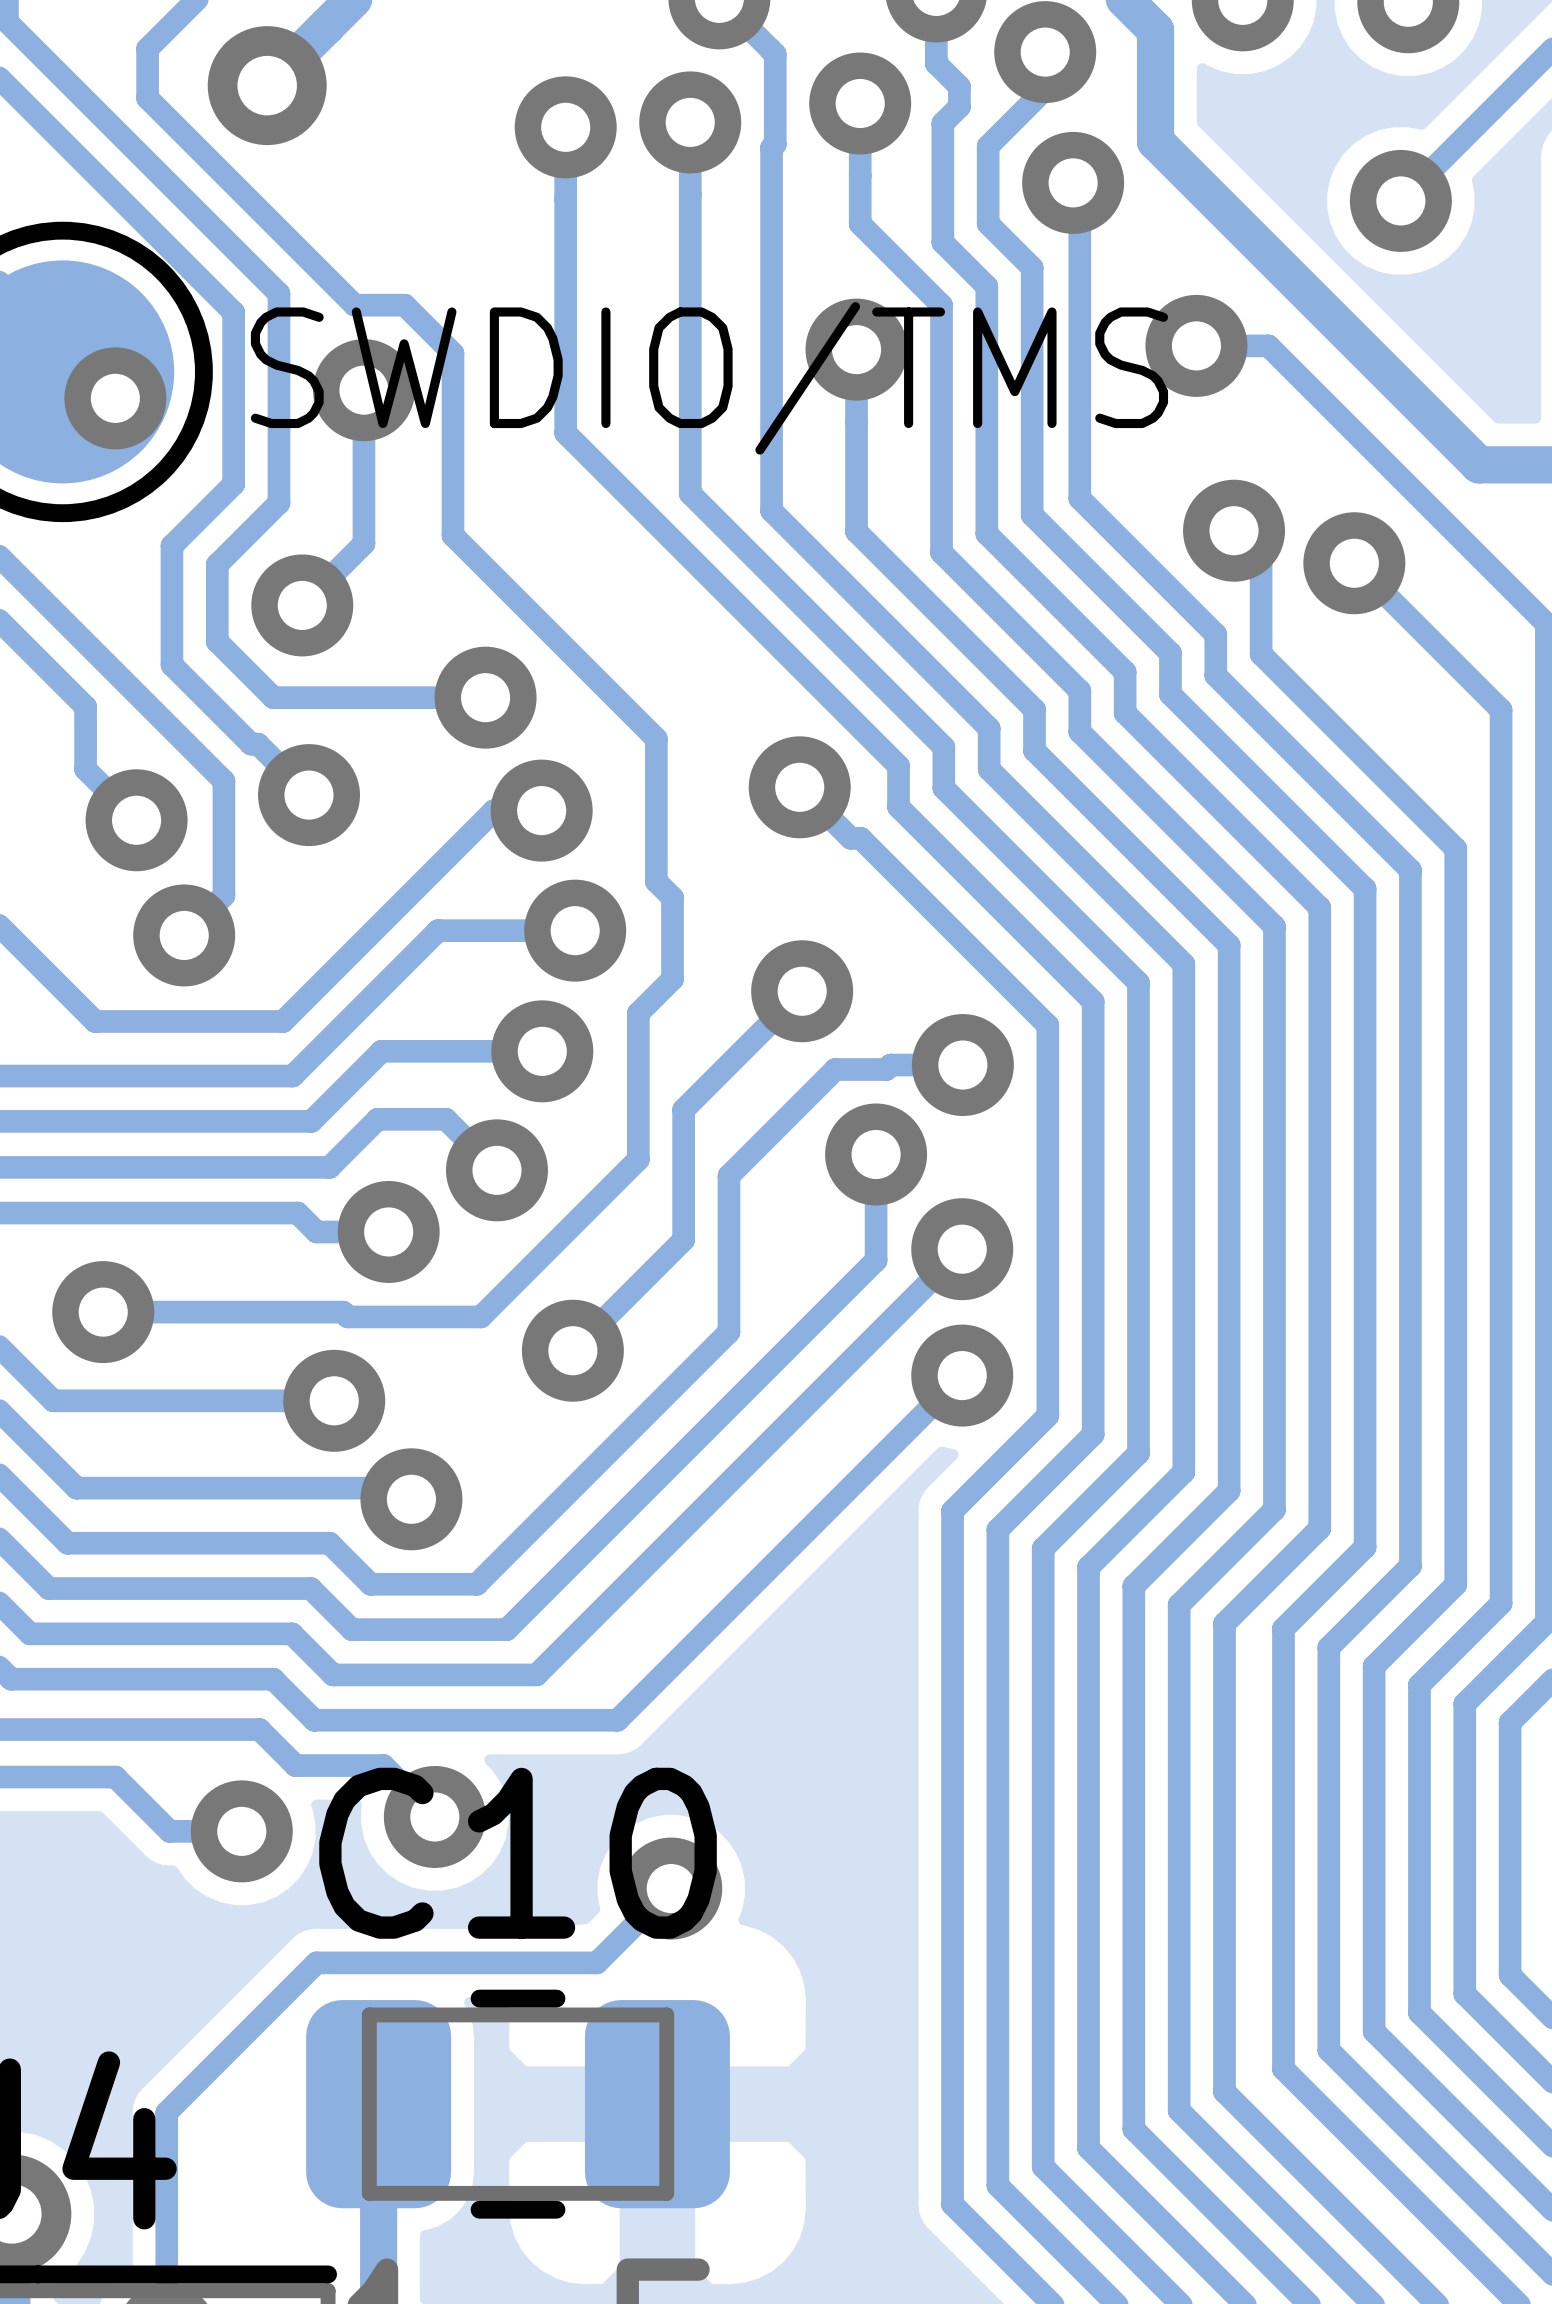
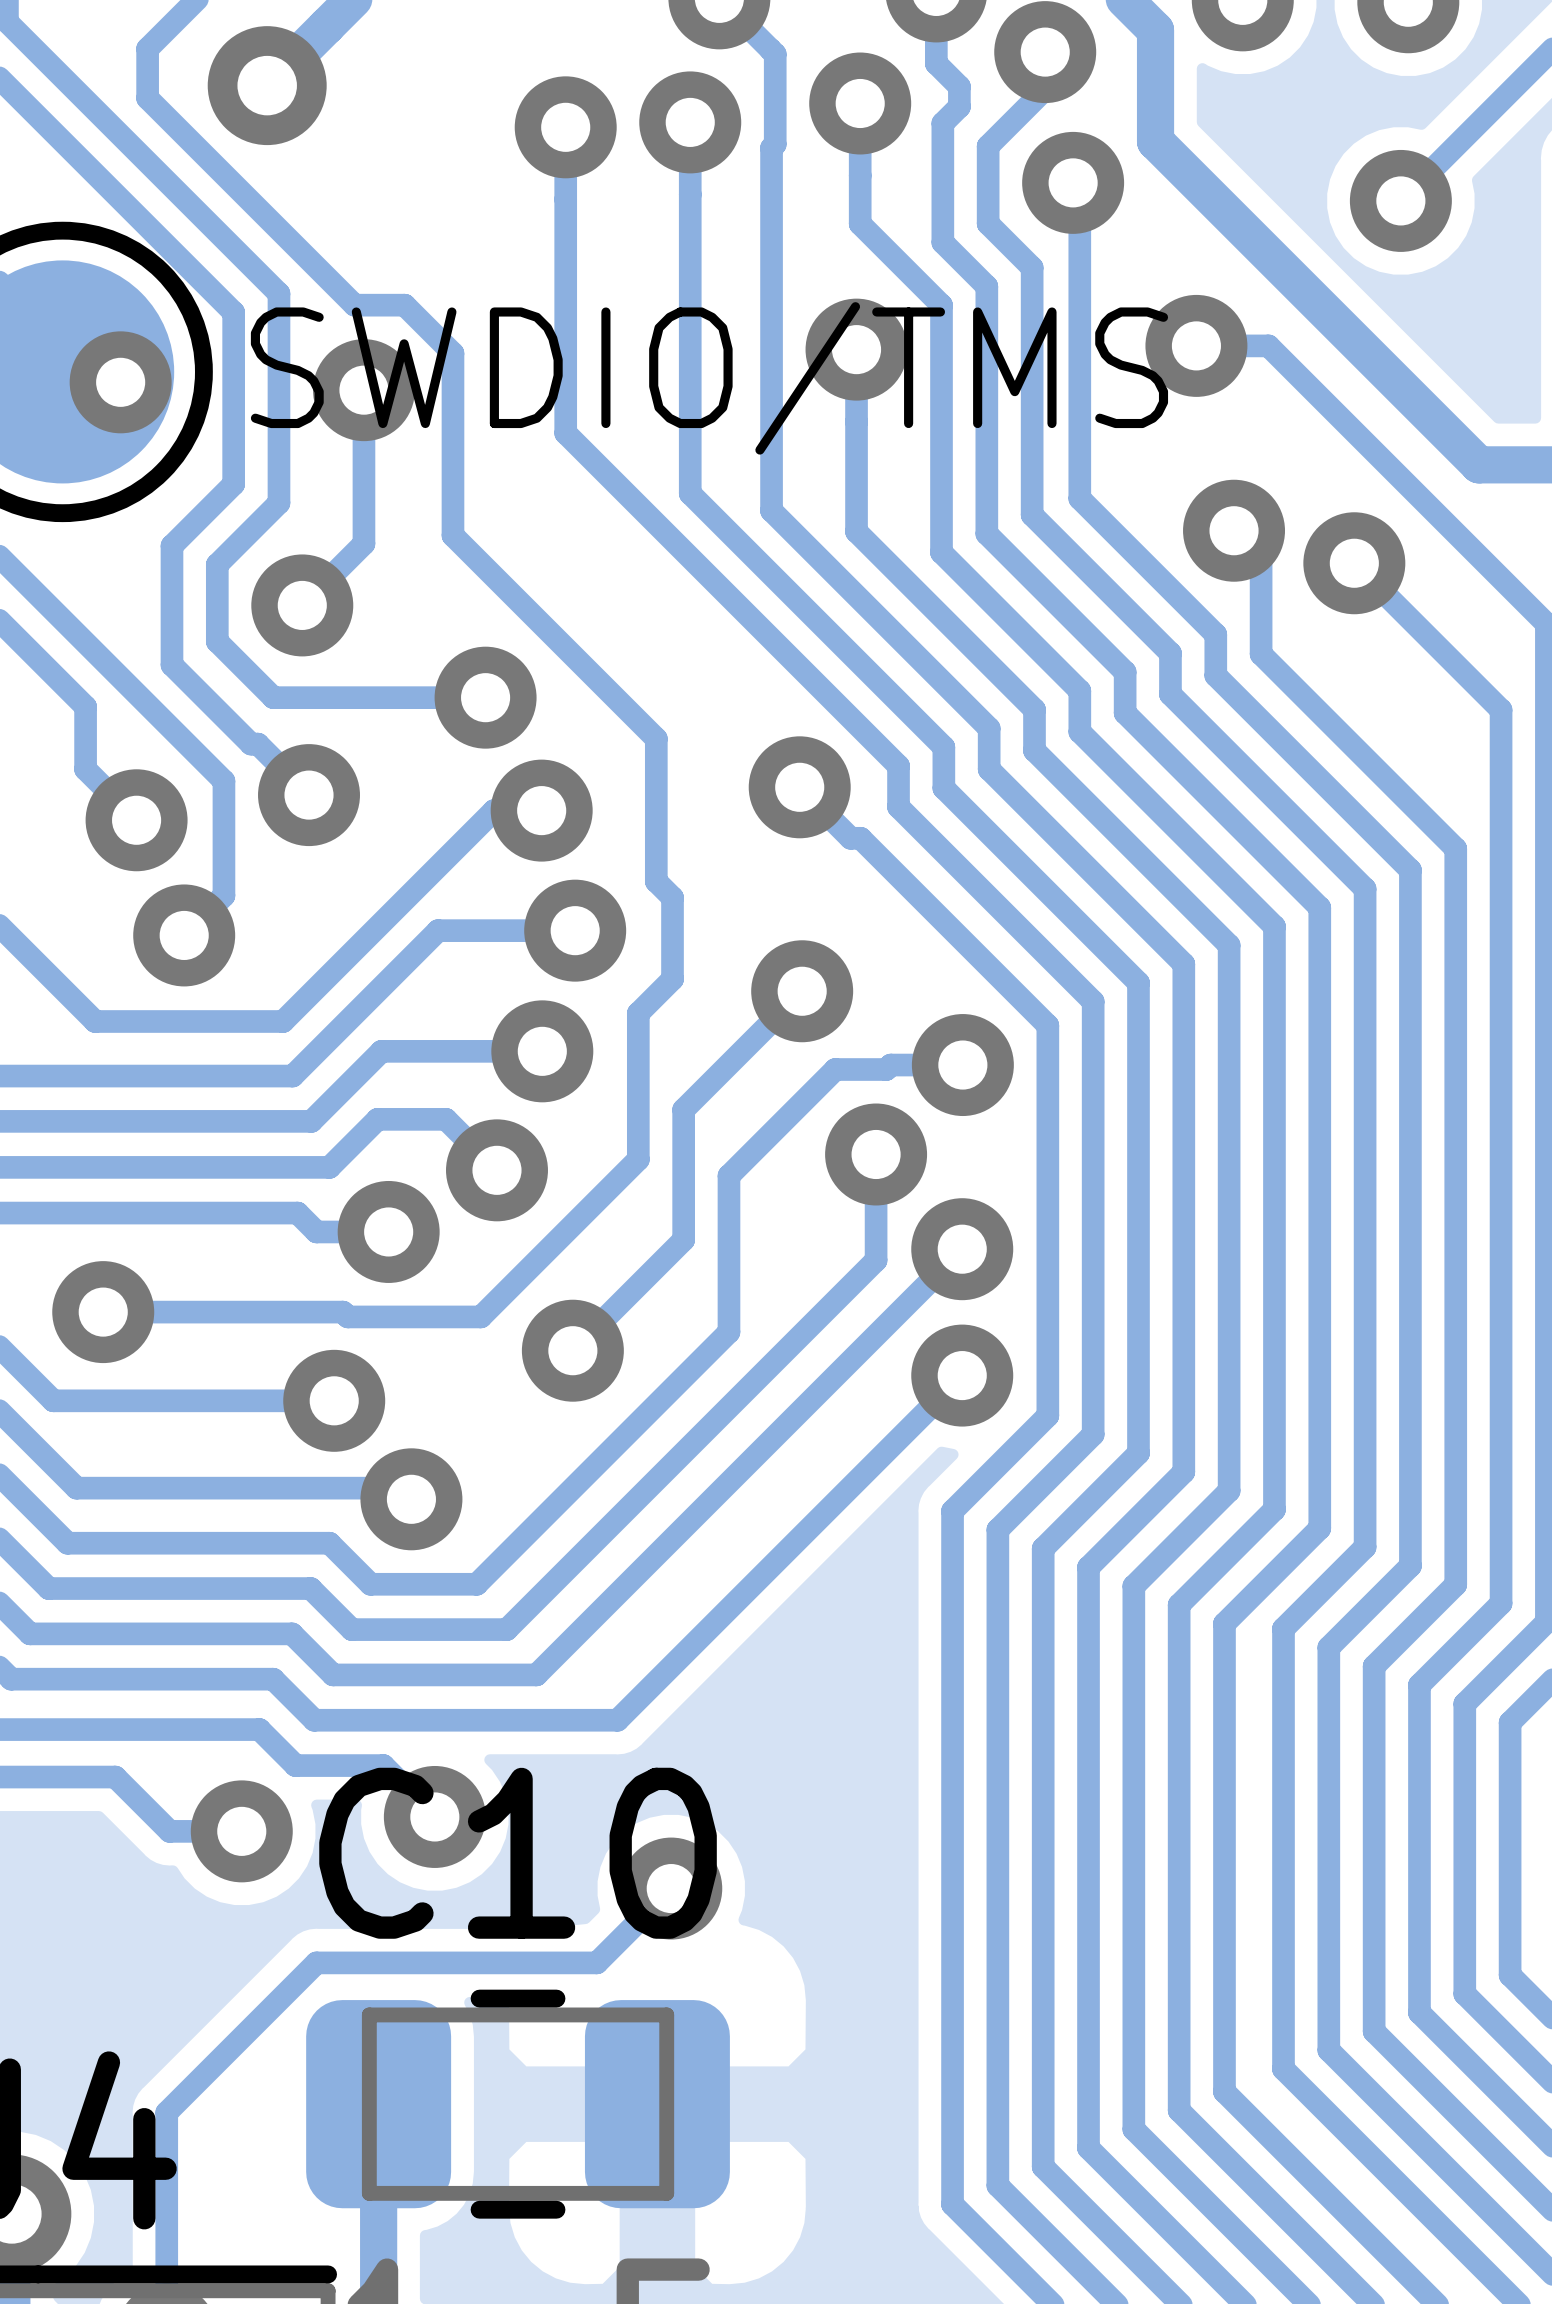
via position: (115, 398) -> (120, 382)

